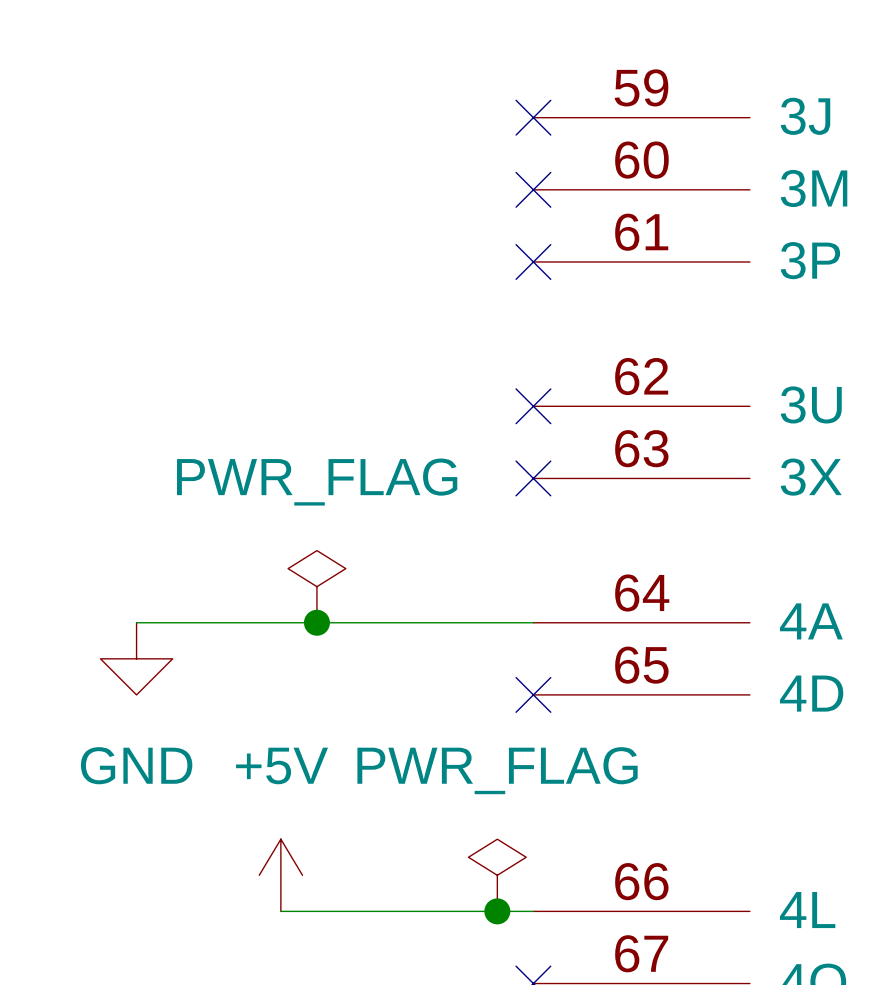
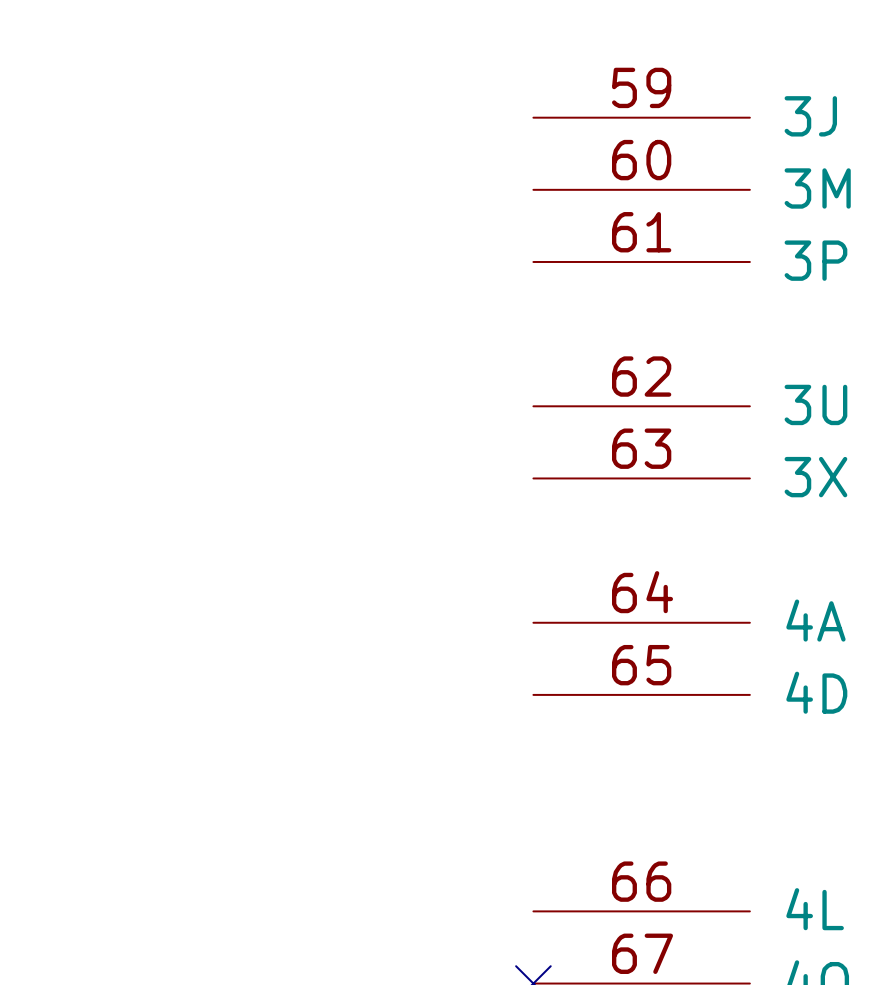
no-connect mark: (533, 117) -> none
no-connect mark: (533, 189) -> none
no-connect mark: (533, 261) -> none
no-connect mark: (533, 406) -> none
no-connect mark: (533, 478) -> none
power symbol: PWR_FLAG (316, 586) -> none
wire: (136, 622) (533, 622) -> none
junction: (316, 622) -> none
power symbol: GND (136, 658) -> none
no-connect mark: (533, 694) -> none
power symbol: +5V (280, 875) -> none
power symbol: PWR_FLAG (497, 875) -> none
wire: (280, 911) (533, 911) -> none
junction: (497, 911) -> none

